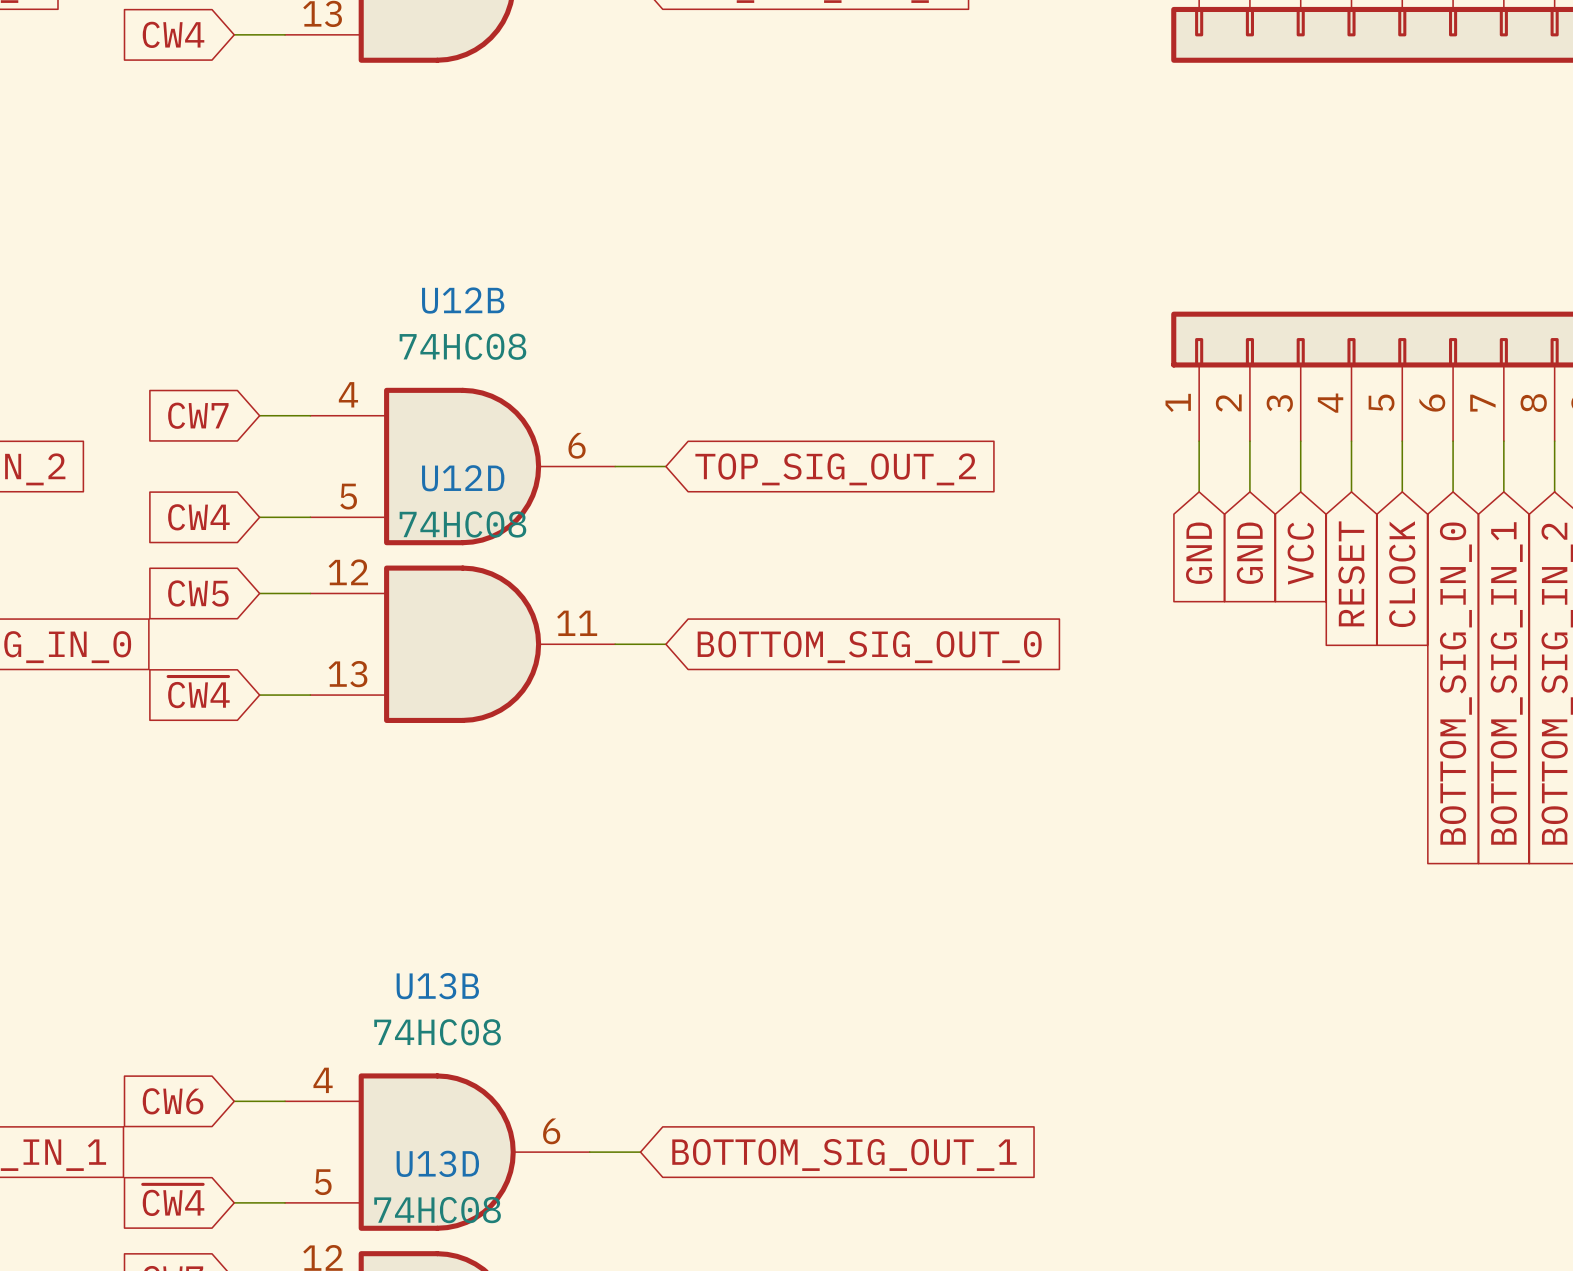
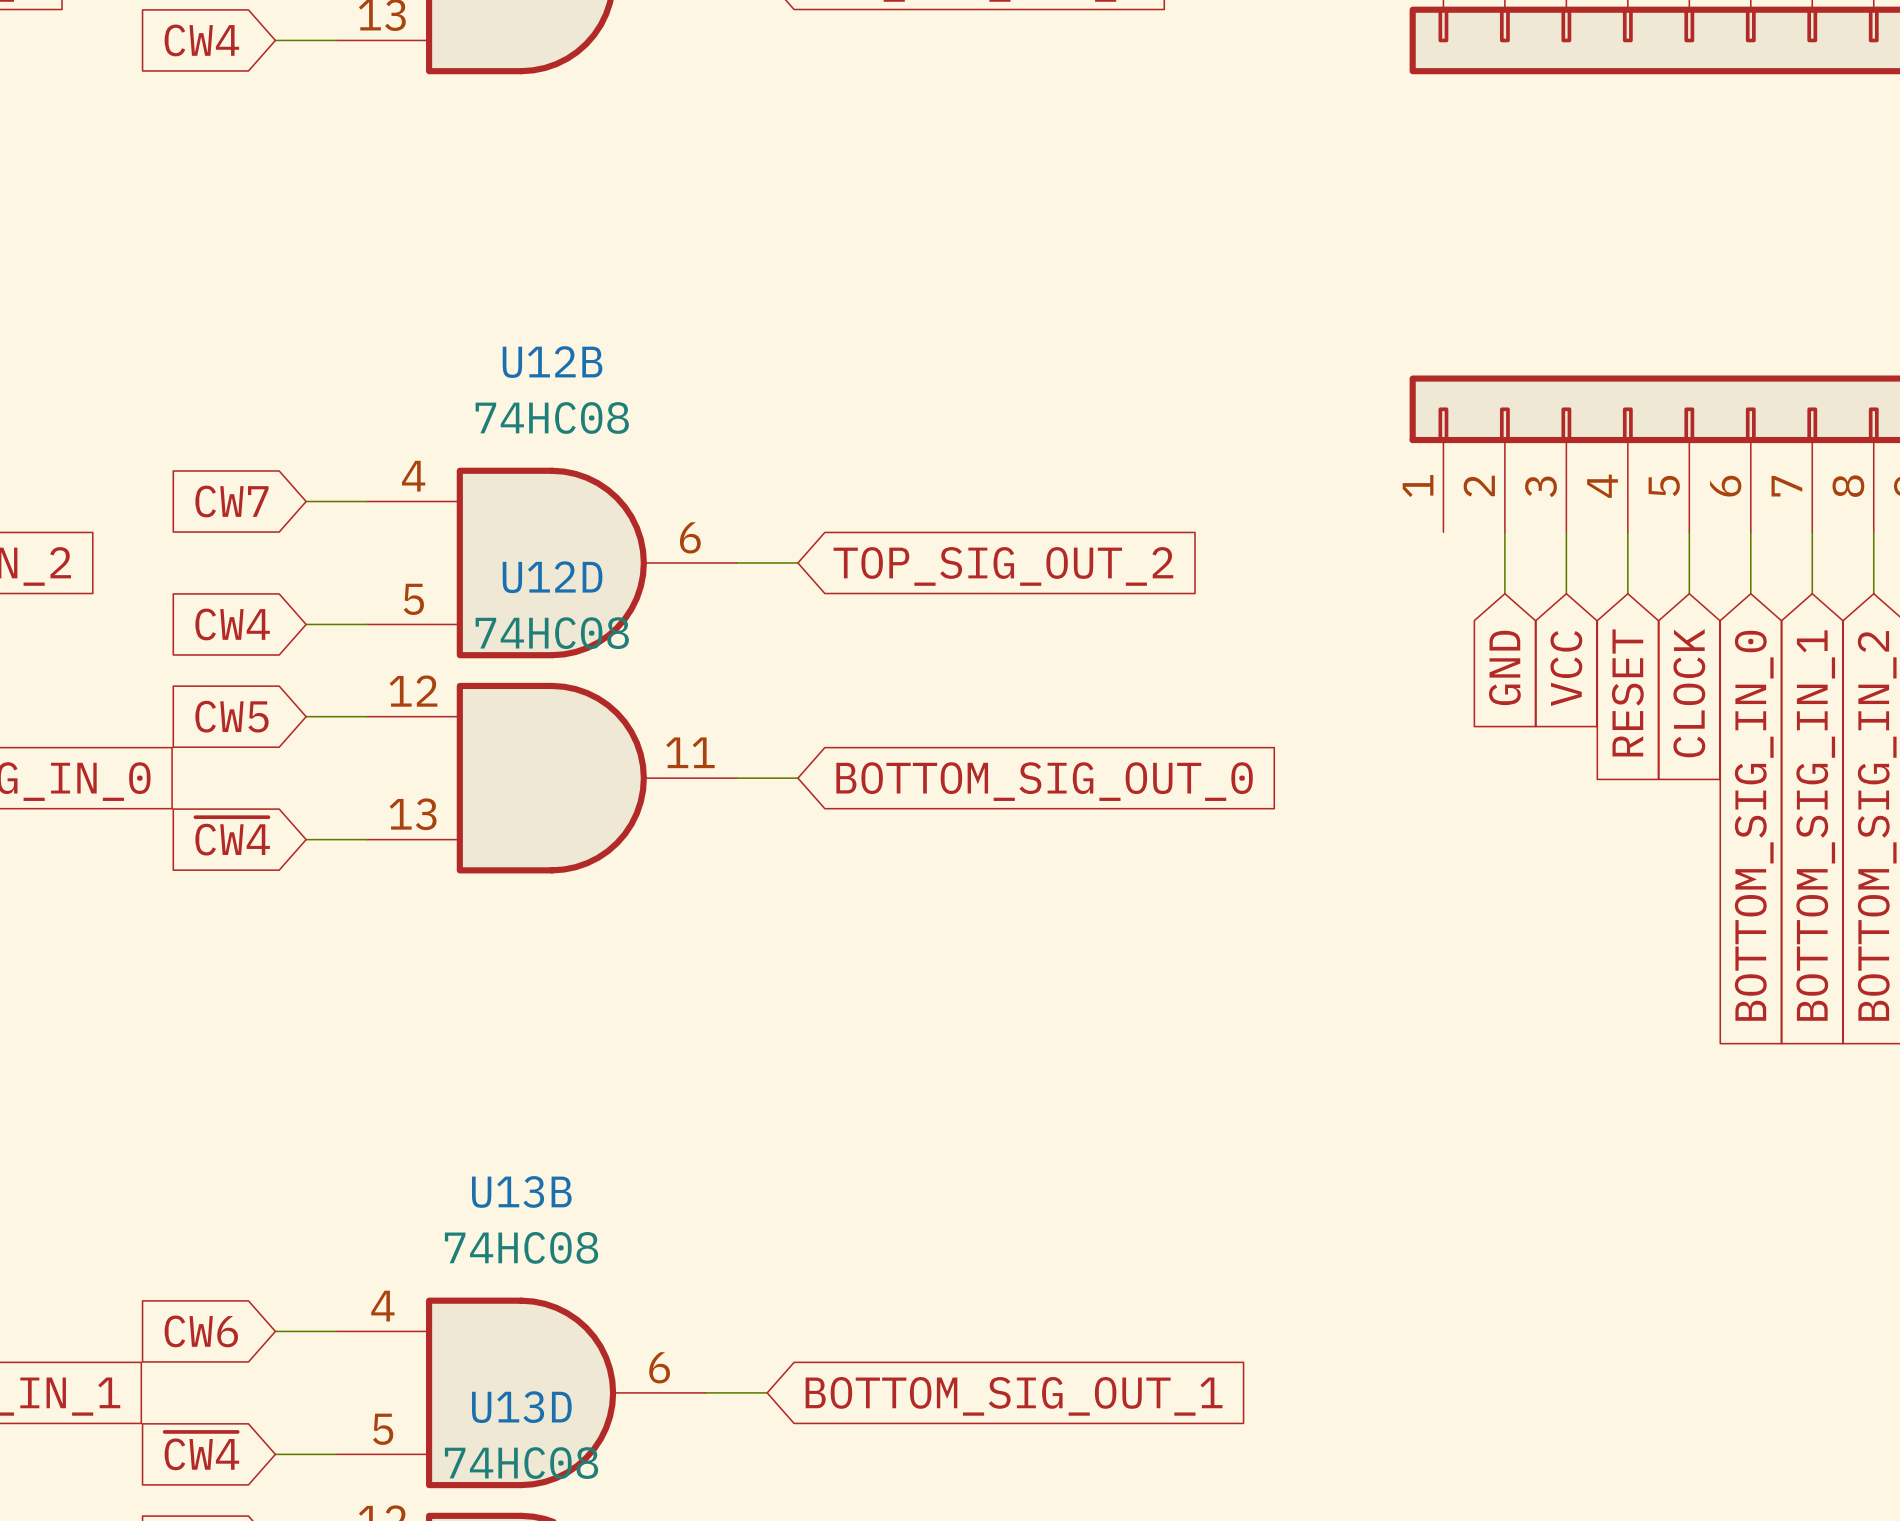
wire: (1199, 441) (1199, 491) -> none
global label: GND (1199, 553) -> none

